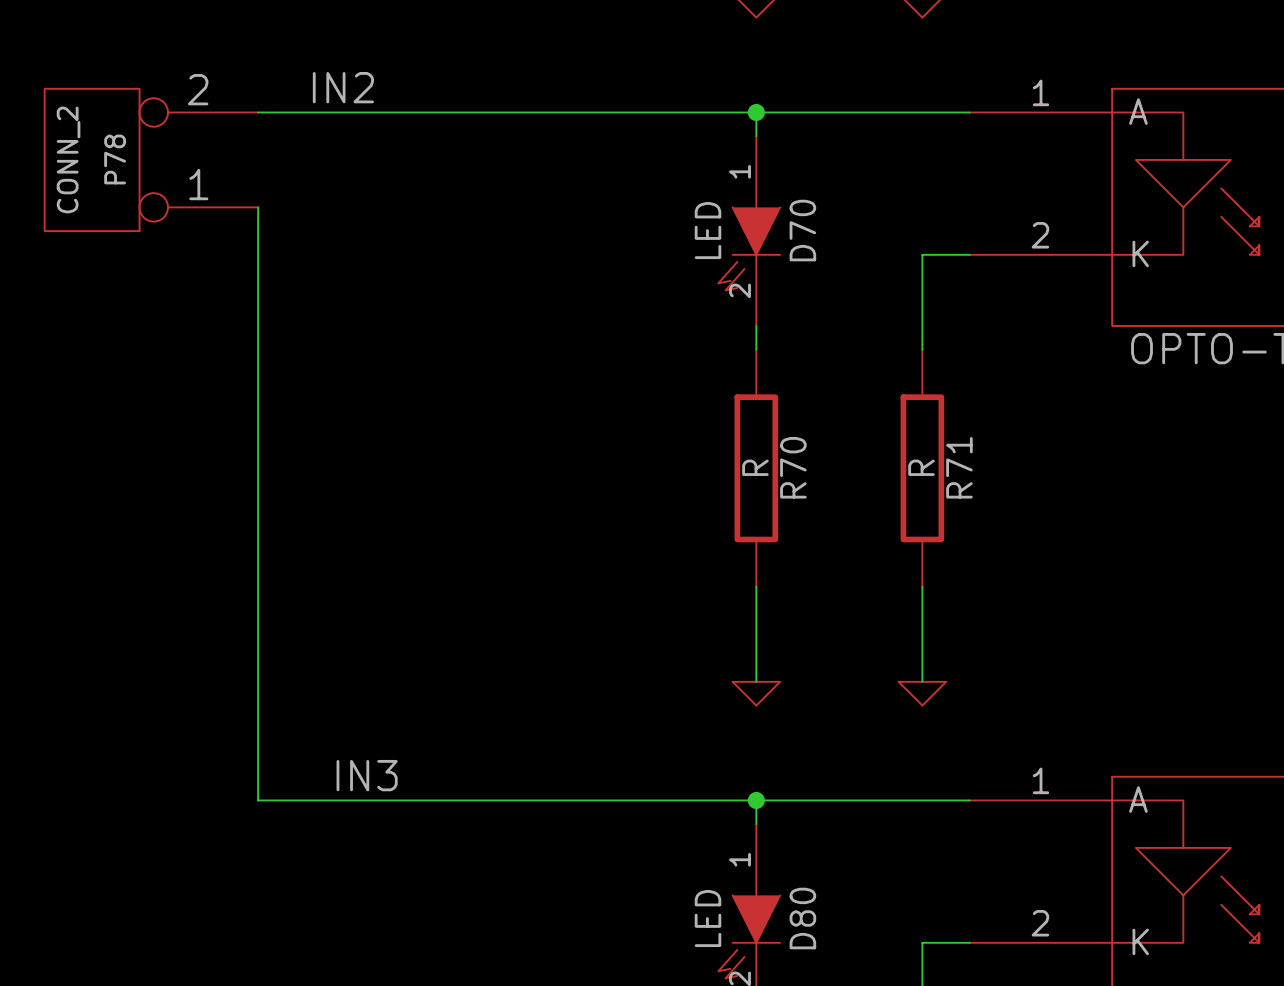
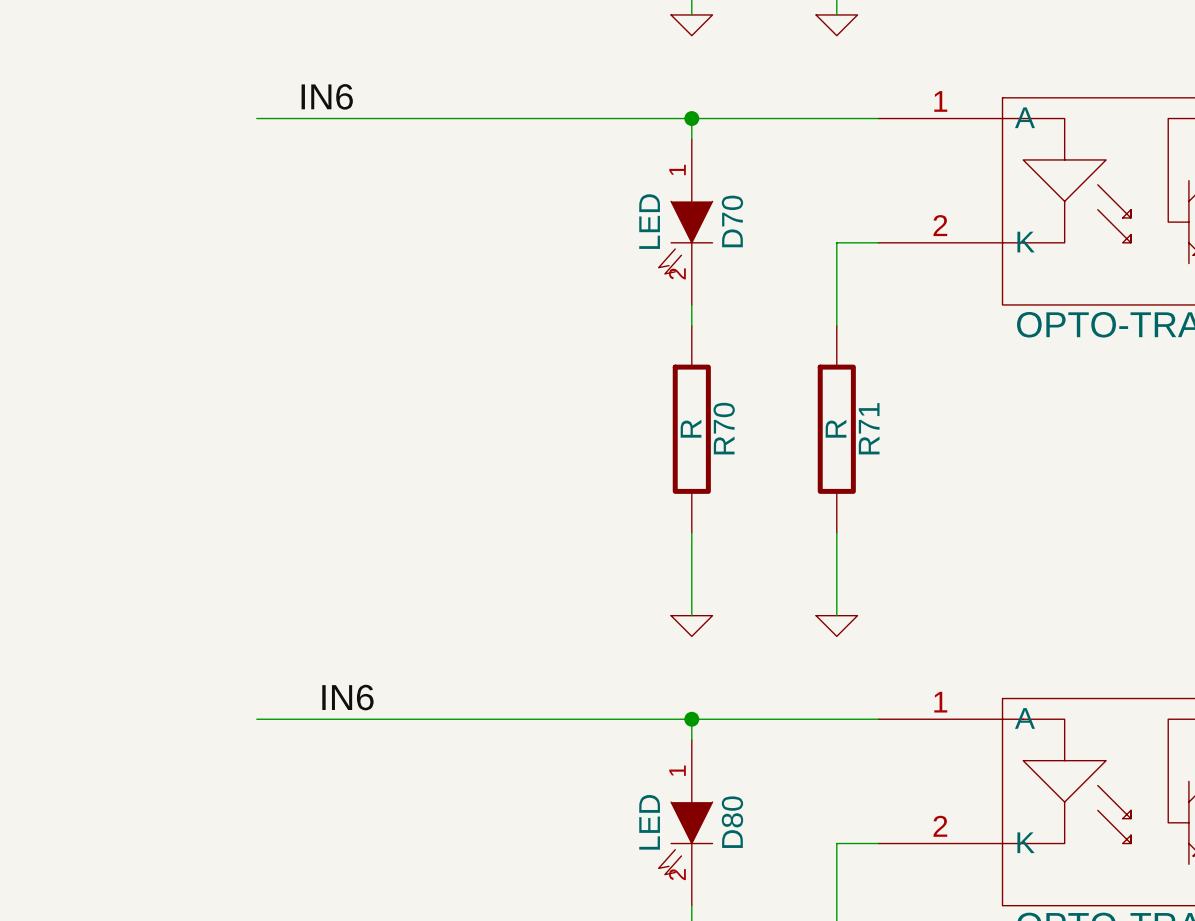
label: IN2 (343, 87) -> IN6 (327, 96)
P78: CONN_2 (151, 159) -> none
wire: (258, 207) (258, 800) -> none
label: IN3 (367, 775) -> IN6 (347, 697)

